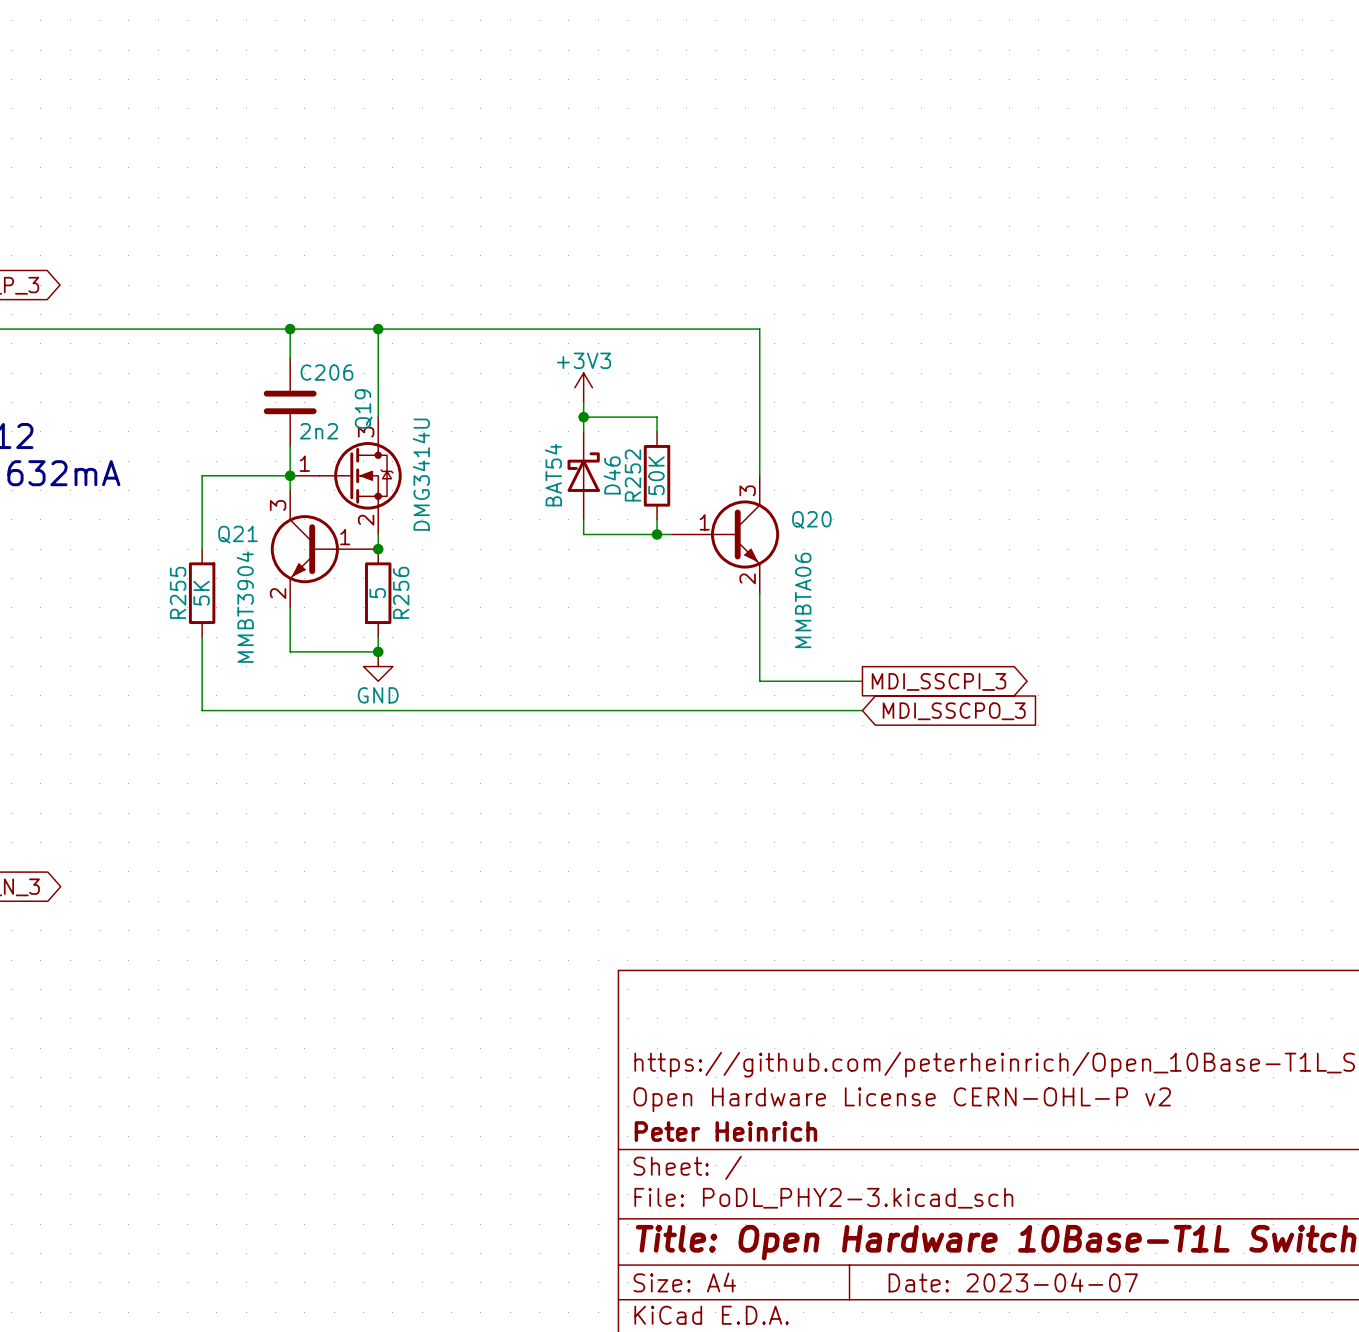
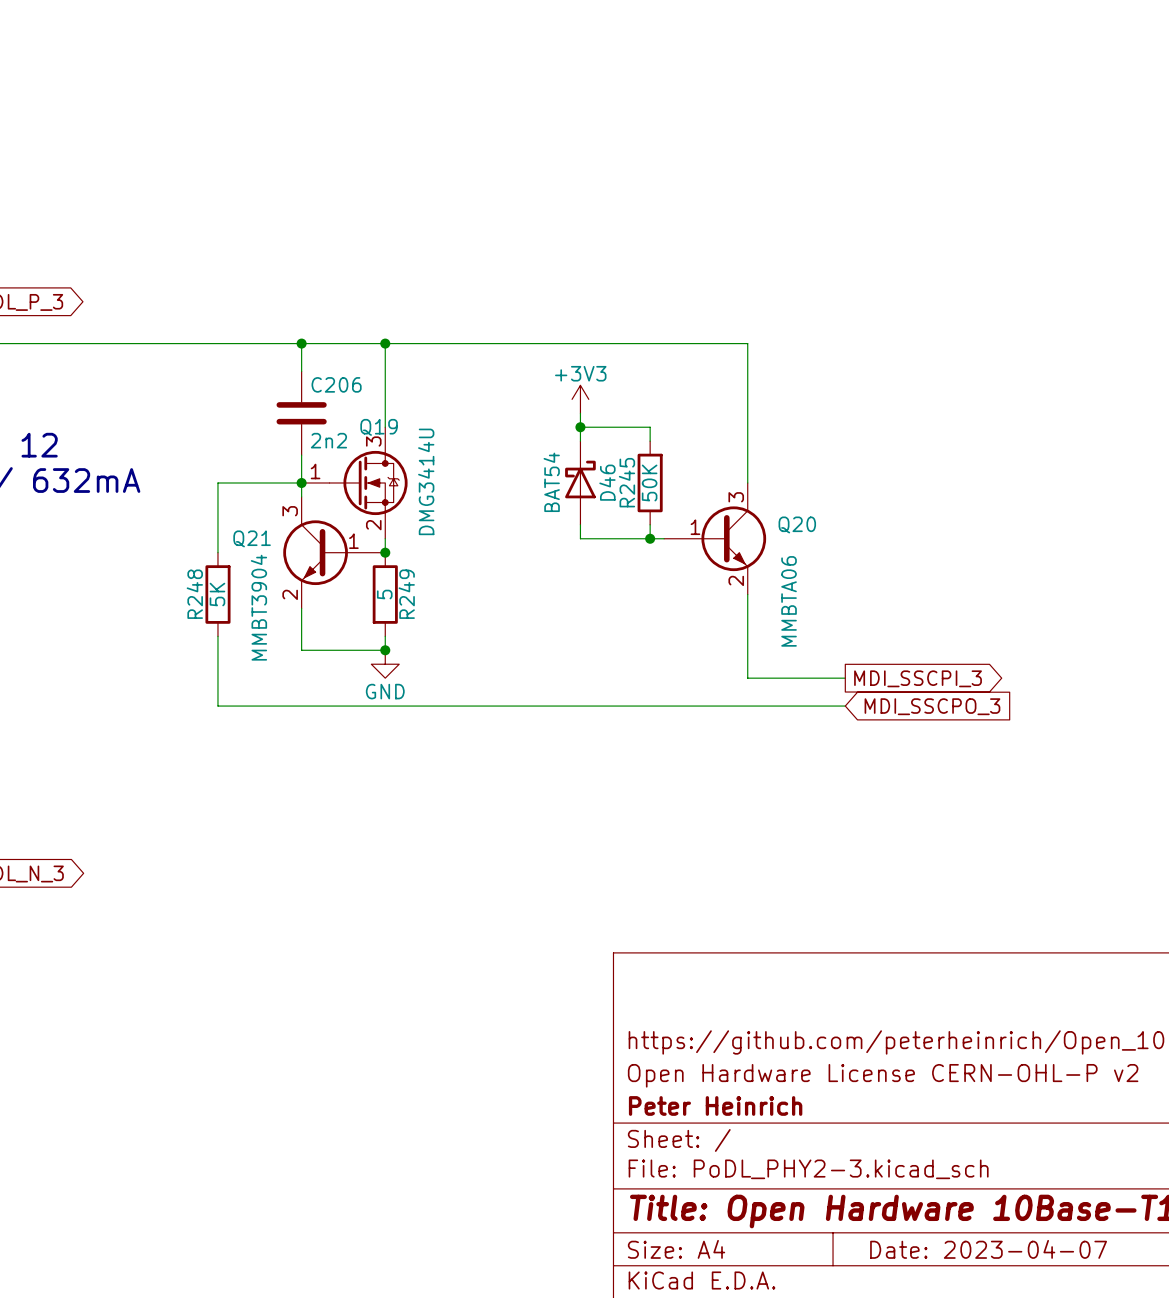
Q19 name rotation: 0° (363, 408) -> 90° clockwise (379, 427)
R252 name: R252 (632, 475) -> R245 (626, 482)
R255 name: R255 (178, 592) -> R248 (194, 594)
R256 name: R256 (401, 592) -> R249 (406, 594)

